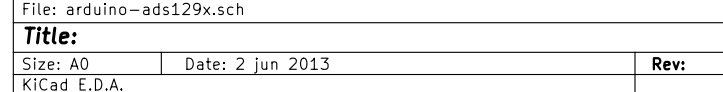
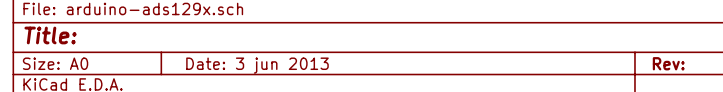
title block: Date: 2 jun 2013 (257, 65) -> Date: 3 jun 2013 (257, 65)

